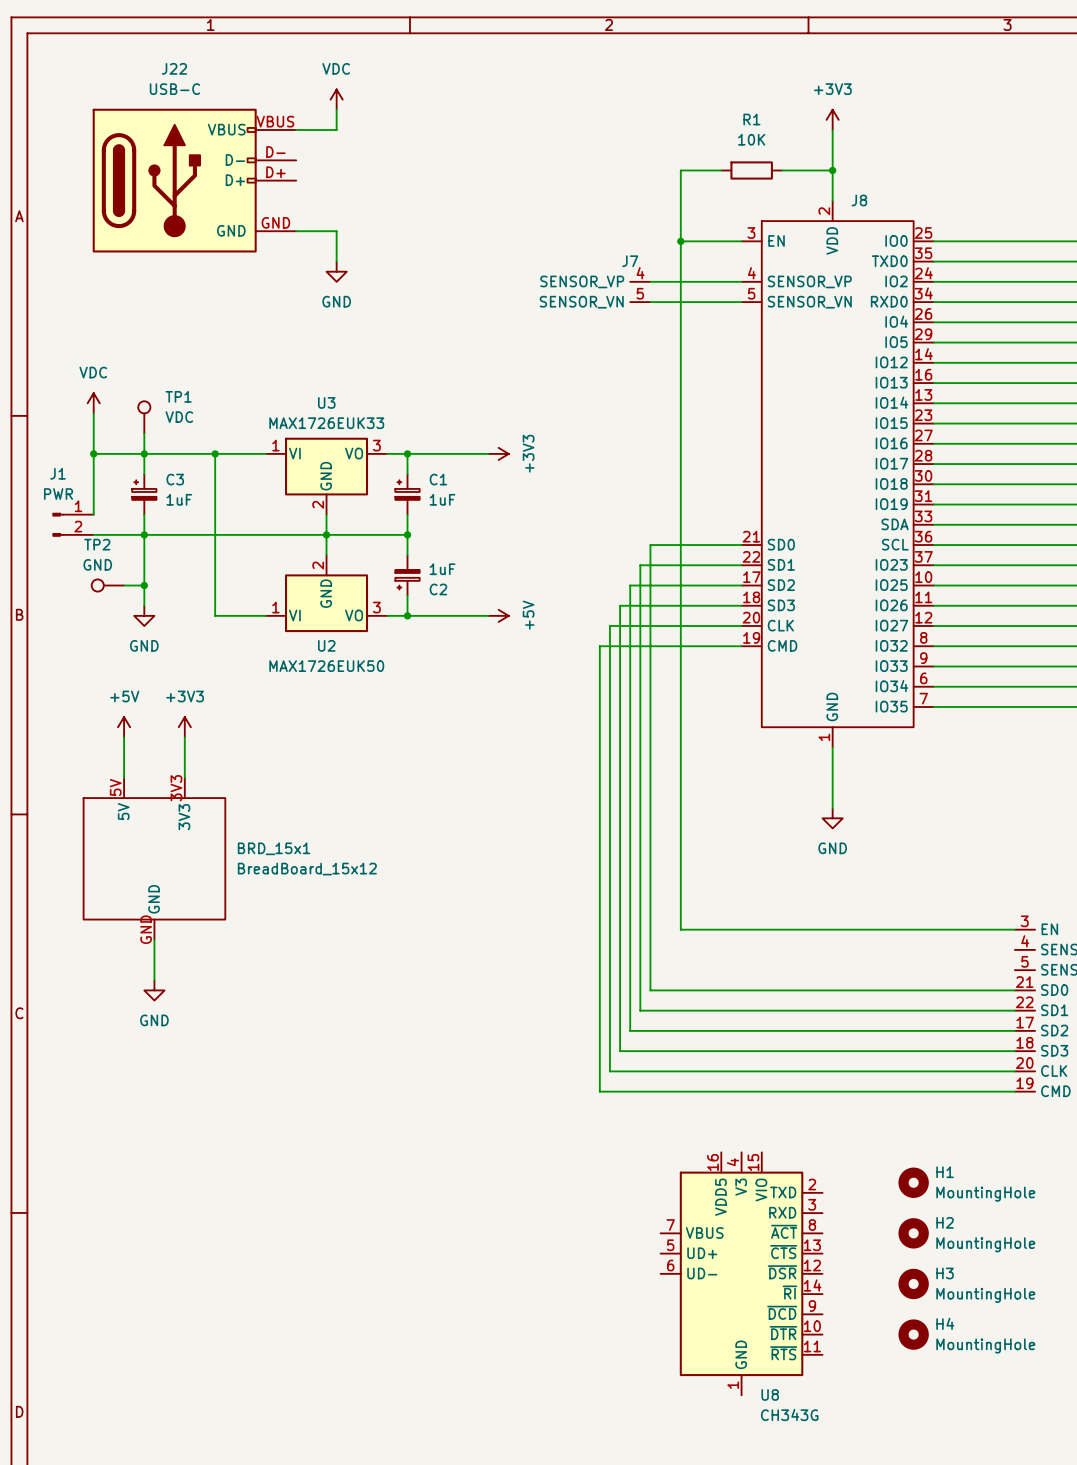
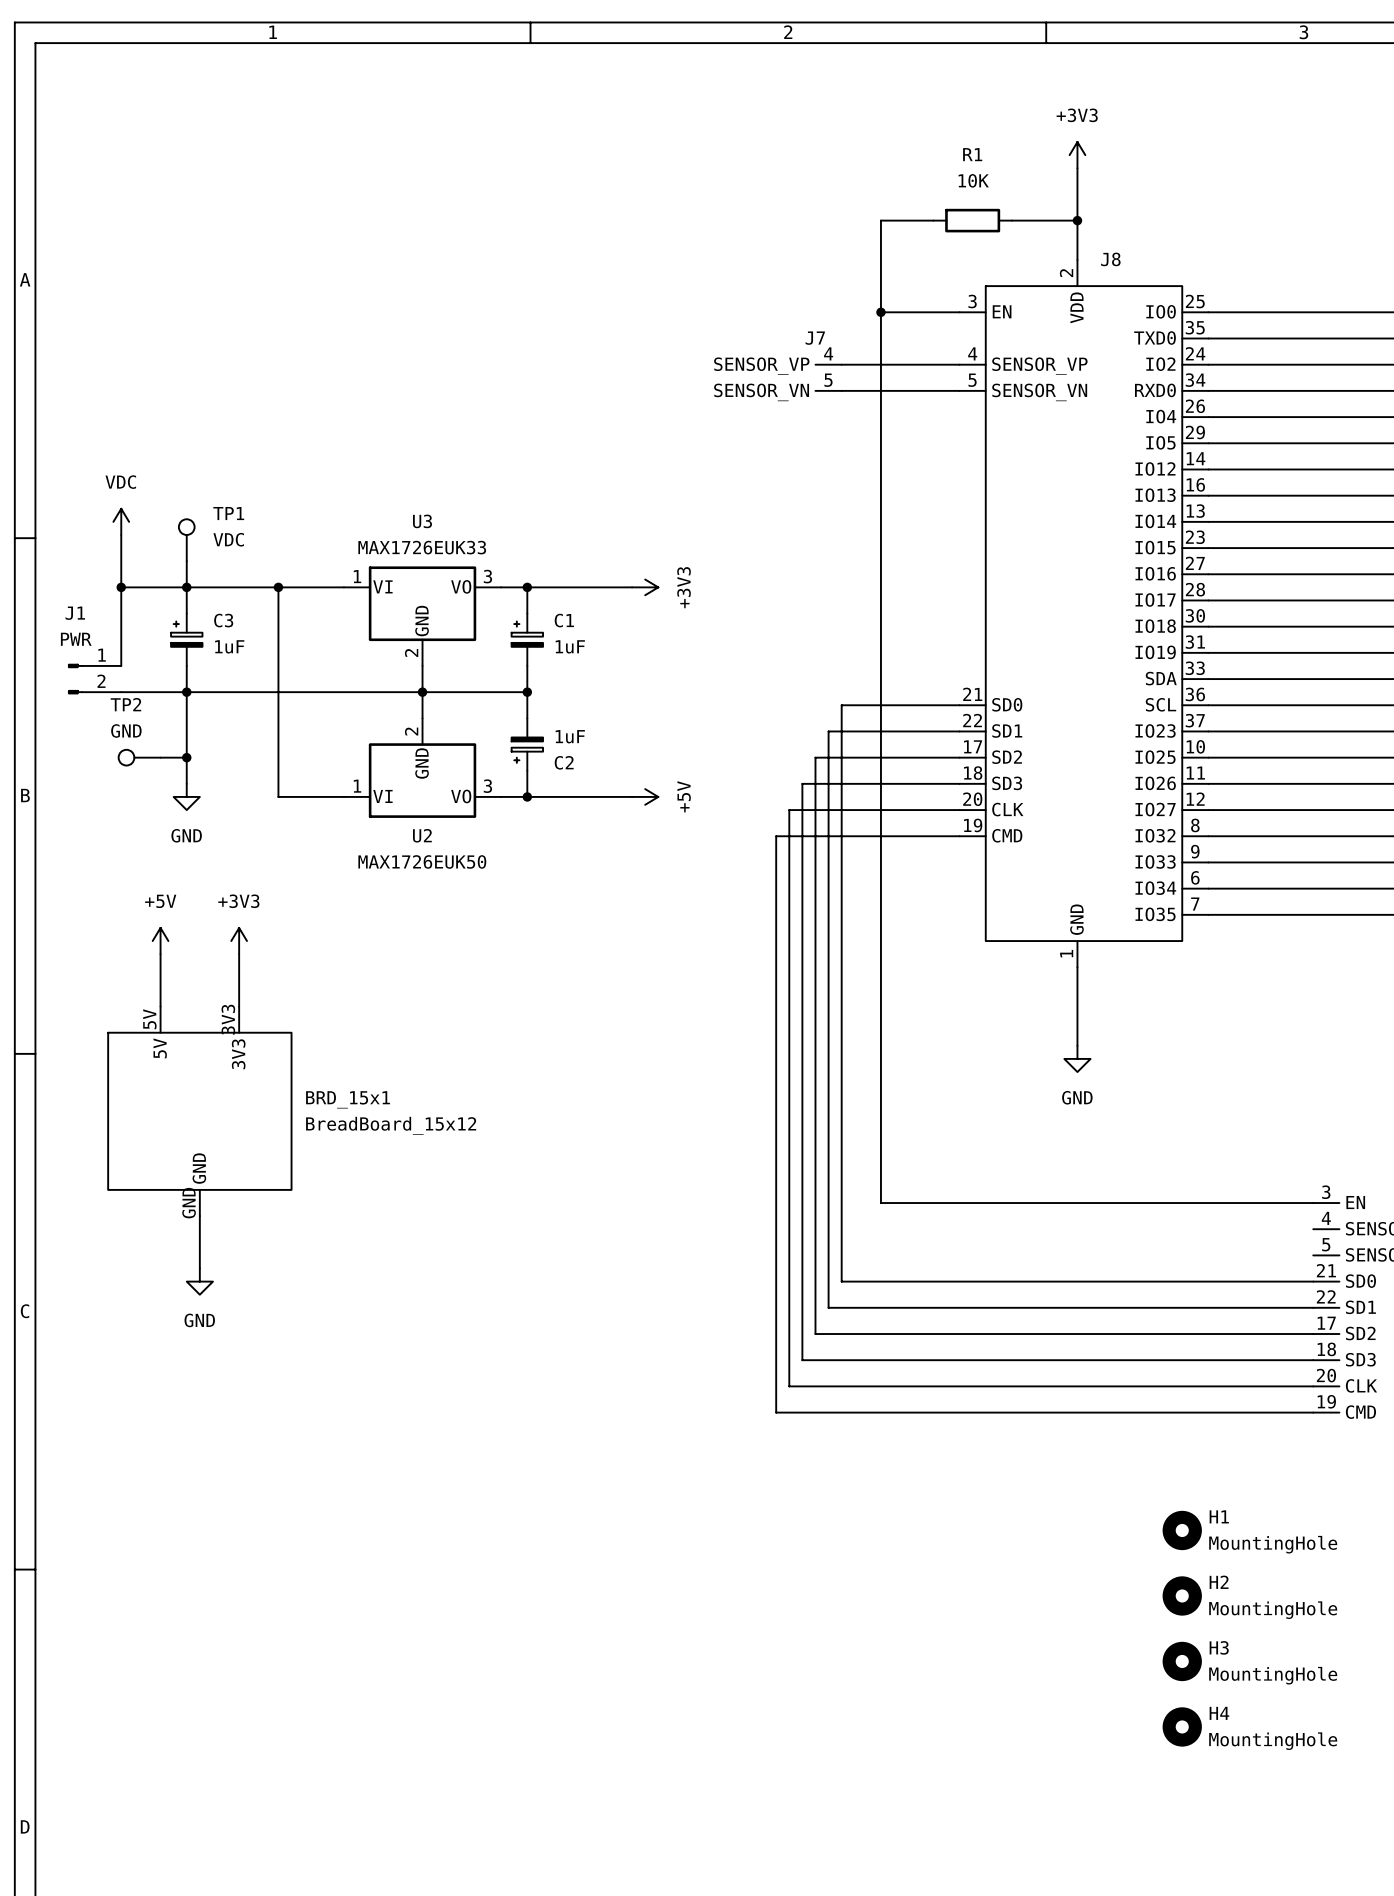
power symbol: VDC (336, 99) -> none
wire: (336, 109) (336, 129) (296, 129) -> none
J22: USB-C (194, 180) -> none
wire: (296, 231) (336, 231) (336, 261) -> none
power symbol: GND (336, 271) -> none
U8: CH343G (741, 1273) -> none

